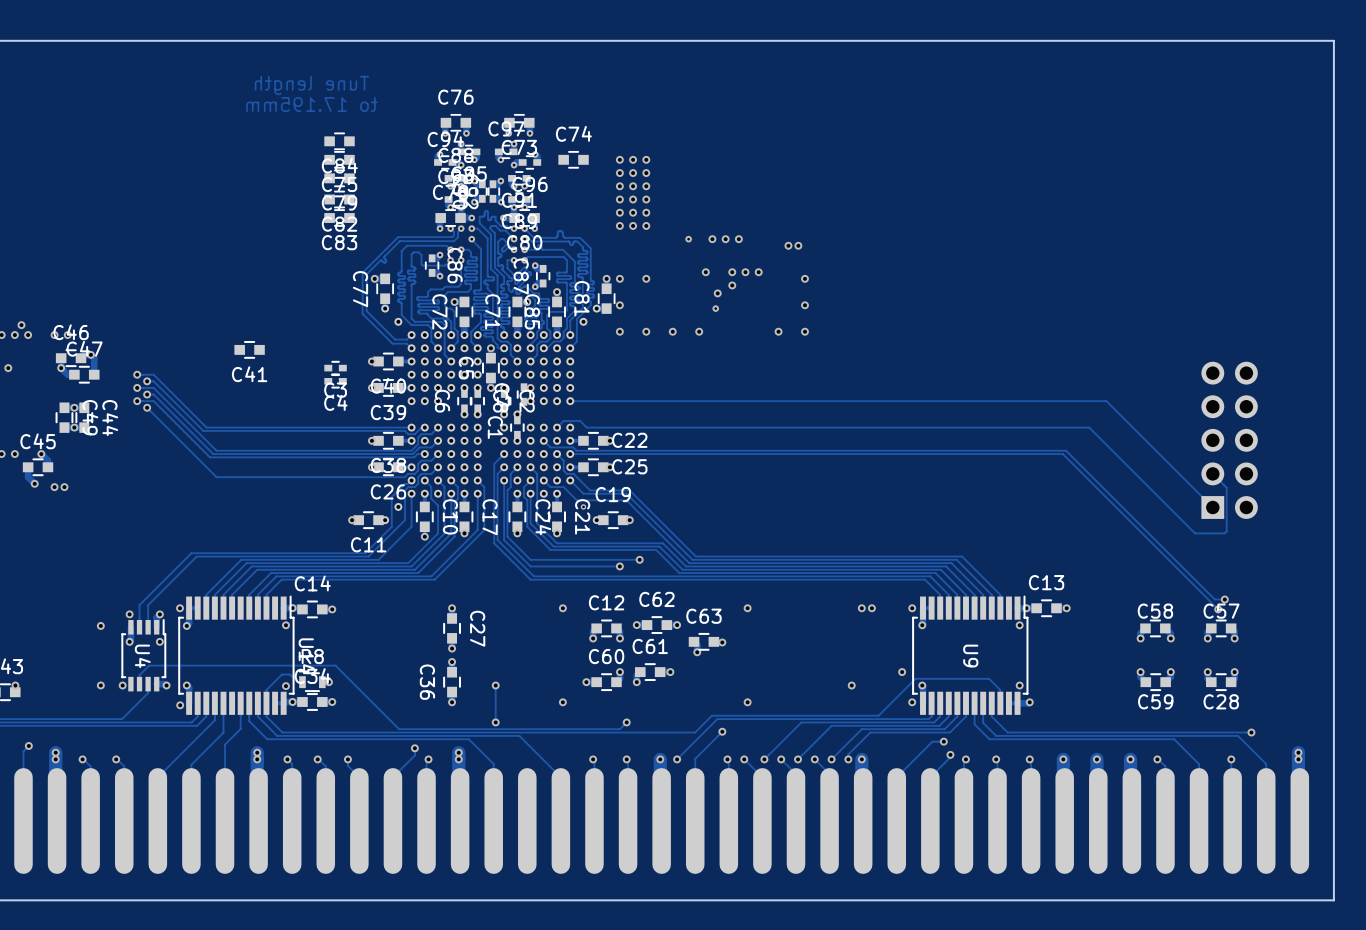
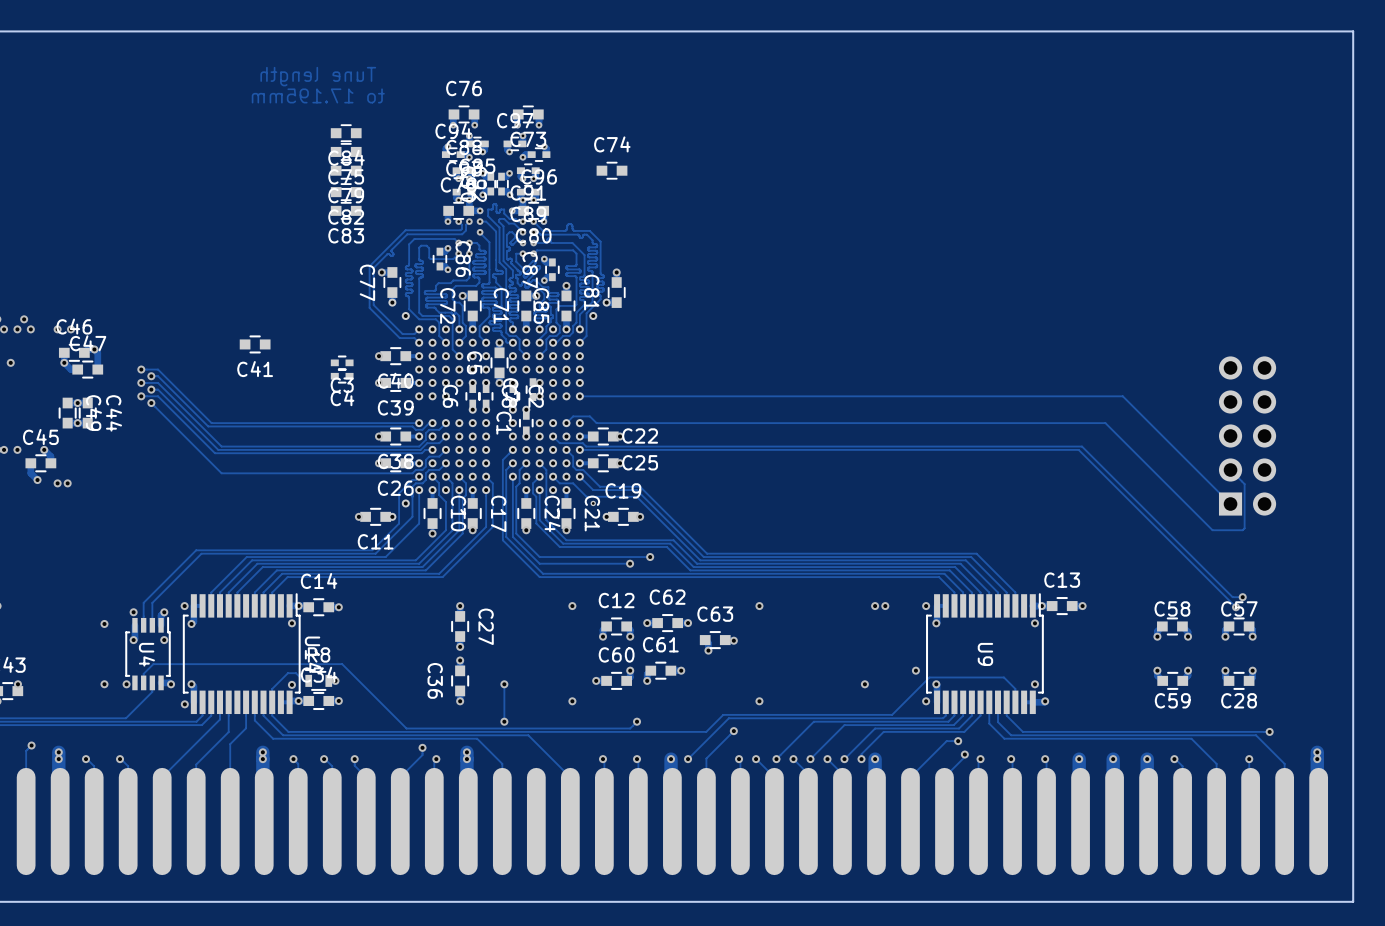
C74 position: (573, 159) -> (612, 170)
via: (619, 159) -> none
via: (633, 159) -> none
via: (646, 159) -> none
via: (619, 173) -> none
via: (633, 173) -> none
via: (646, 173) -> none
via: (619, 186) -> none
via: (633, 186) -> none
via: (646, 186) -> none
via: (619, 199) -> none
via: (633, 199) -> none
via: (646, 199) -> none
via: (619, 212) -> none
via: (633, 212) -> none
via: (646, 212) -> none
via: (619, 225) -> none
via: (633, 225) -> none
via: (646, 225) -> none
via: (688, 239) -> none
via: (712, 239) -> none
via: (725, 239) -> none
via: (738, 239) -> none
via: (788, 245) -> none
via: (798, 245) -> none
via: (705, 272) -> none
via: (732, 272) -> none
via: (745, 272) -> none
via: (758, 272) -> none
via: (619, 278) -> none
via: (646, 278) -> none
via: (804, 278) -> none
via: (732, 285) -> none
via: (717, 293) -> none
via: (619, 305) -> none
via: (804, 305) -> none
via: (715, 308) -> none
via: (619, 331) -> none
via: (646, 331) -> none
via: (672, 331) -> none
via: (699, 331) -> none
via: (778, 331) -> none
via: (804, 331) -> none

